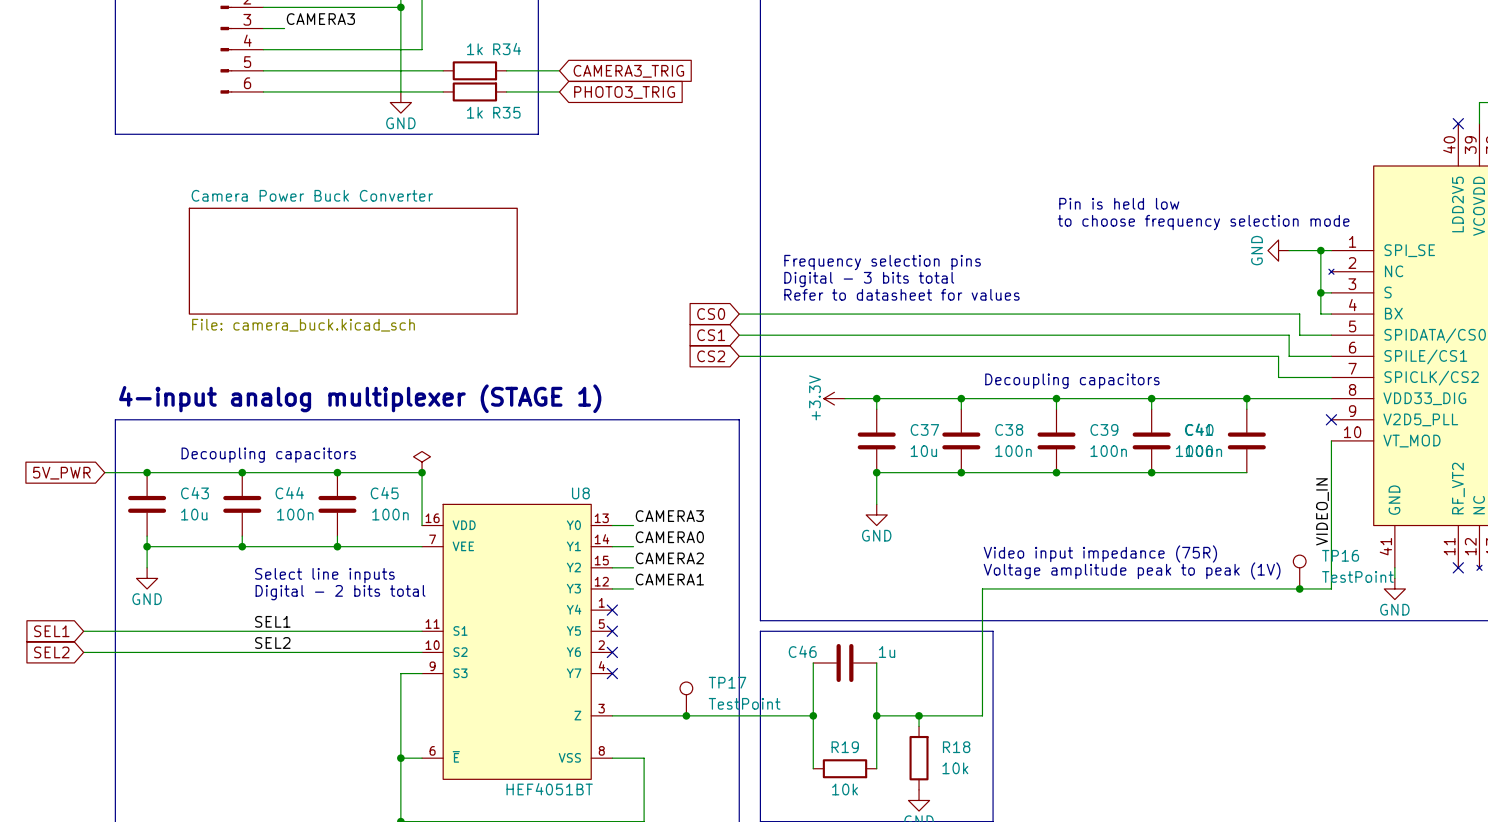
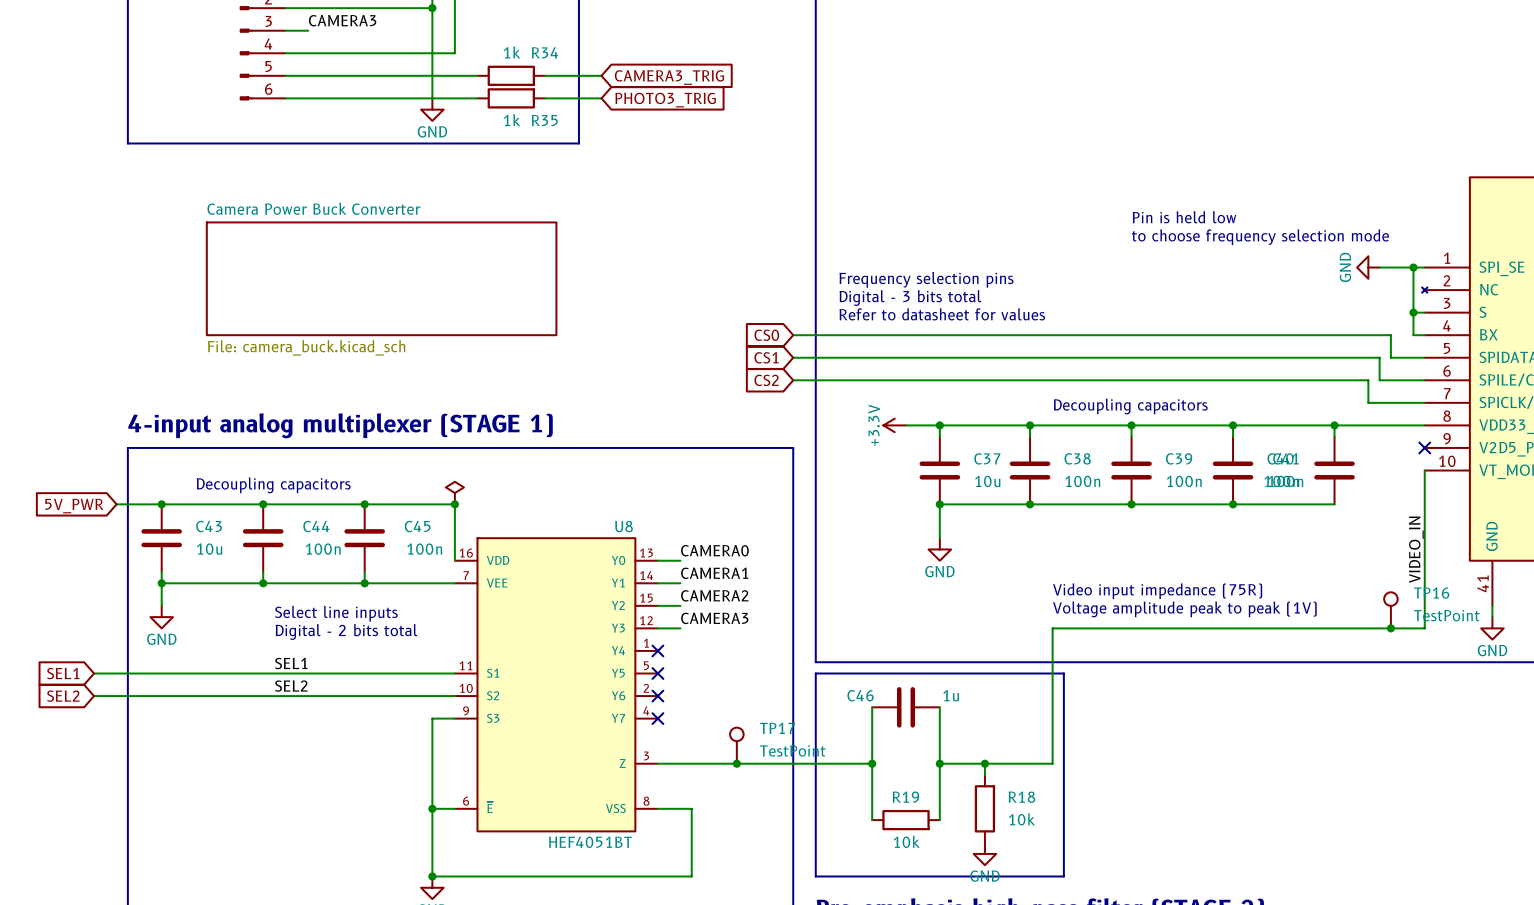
label: CAMERA3 (669, 516) -> CAMERA0 (714, 550)
label: CAMERA0 (669, 537) -> CAMERA1 (714, 573)
label: CAMERA1 (669, 579) -> CAMERA3 (714, 618)

